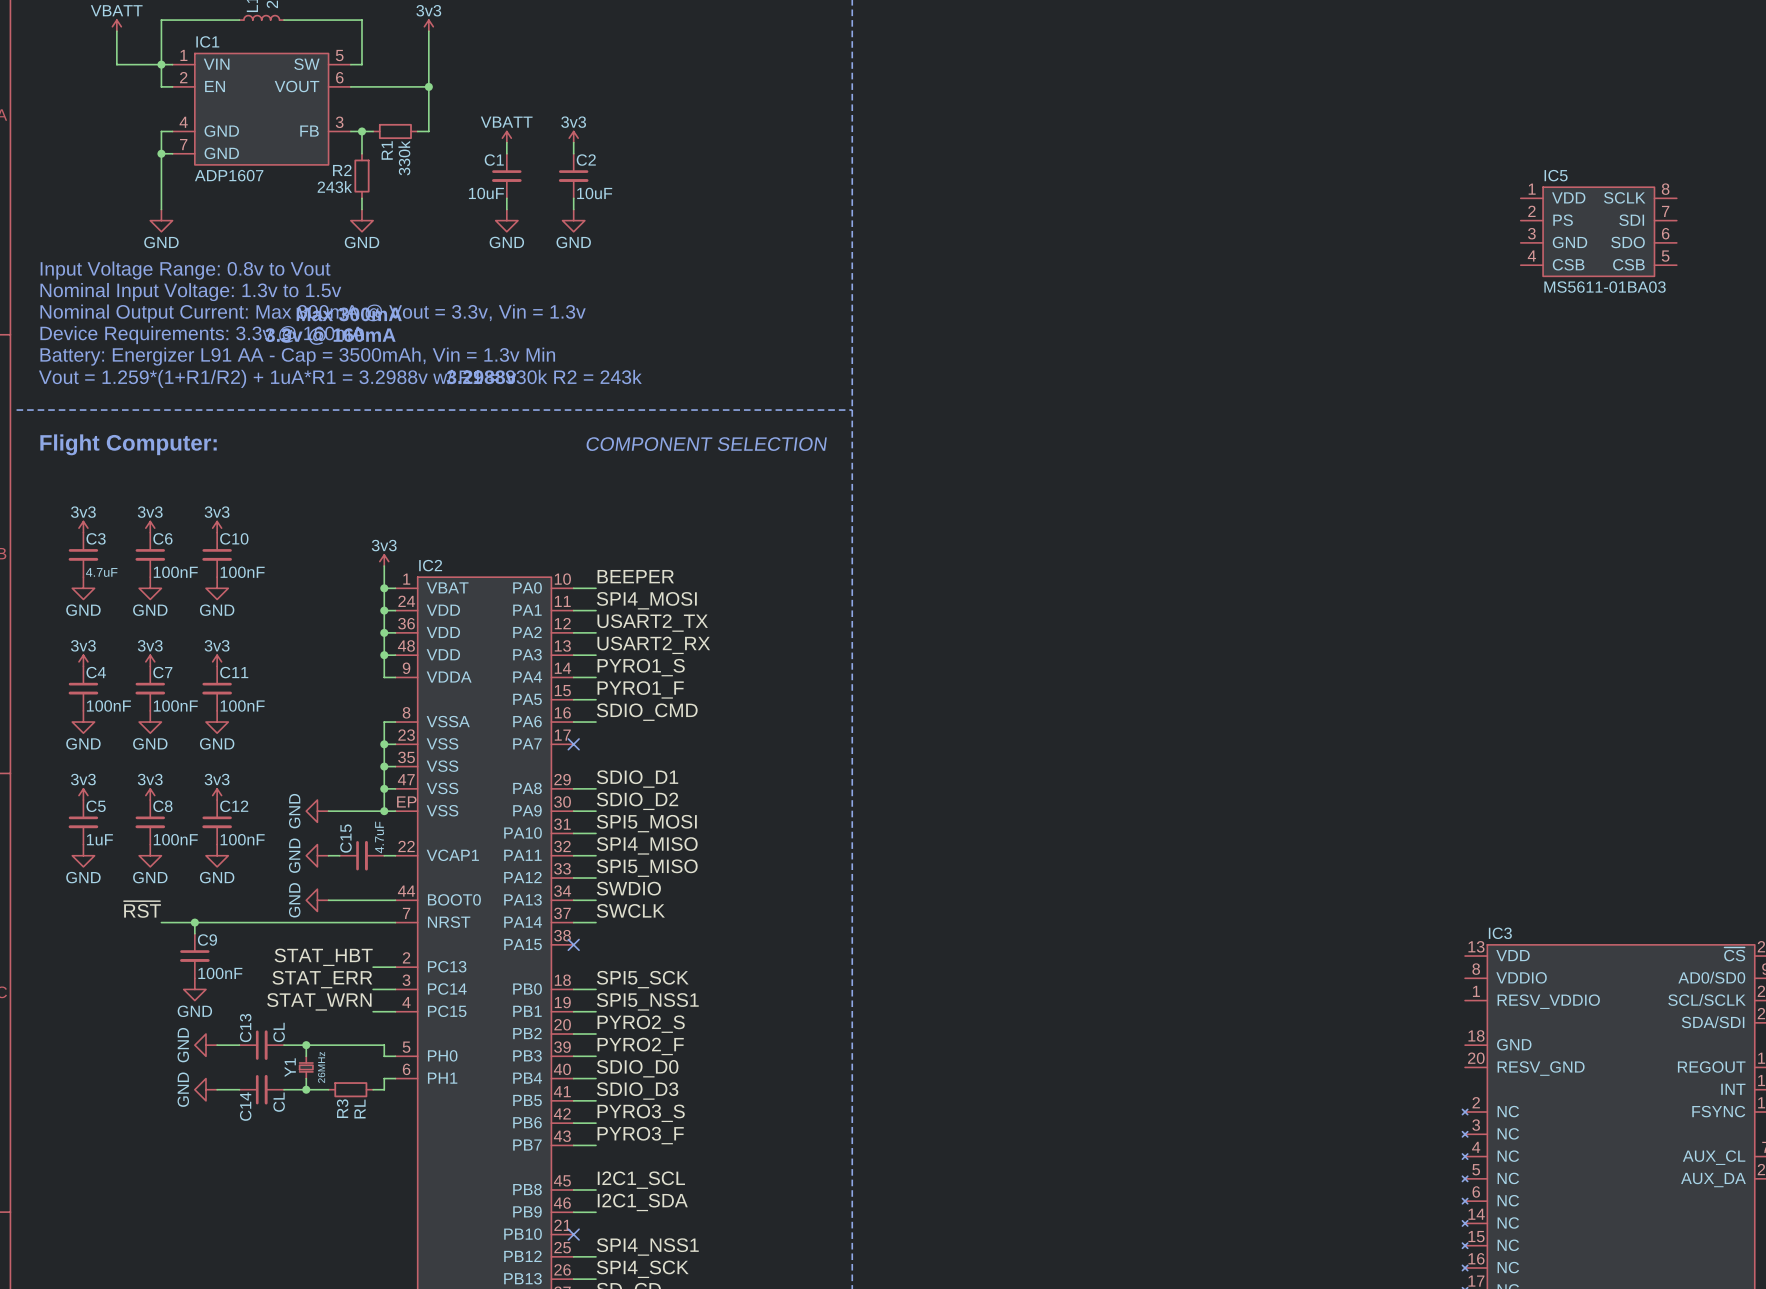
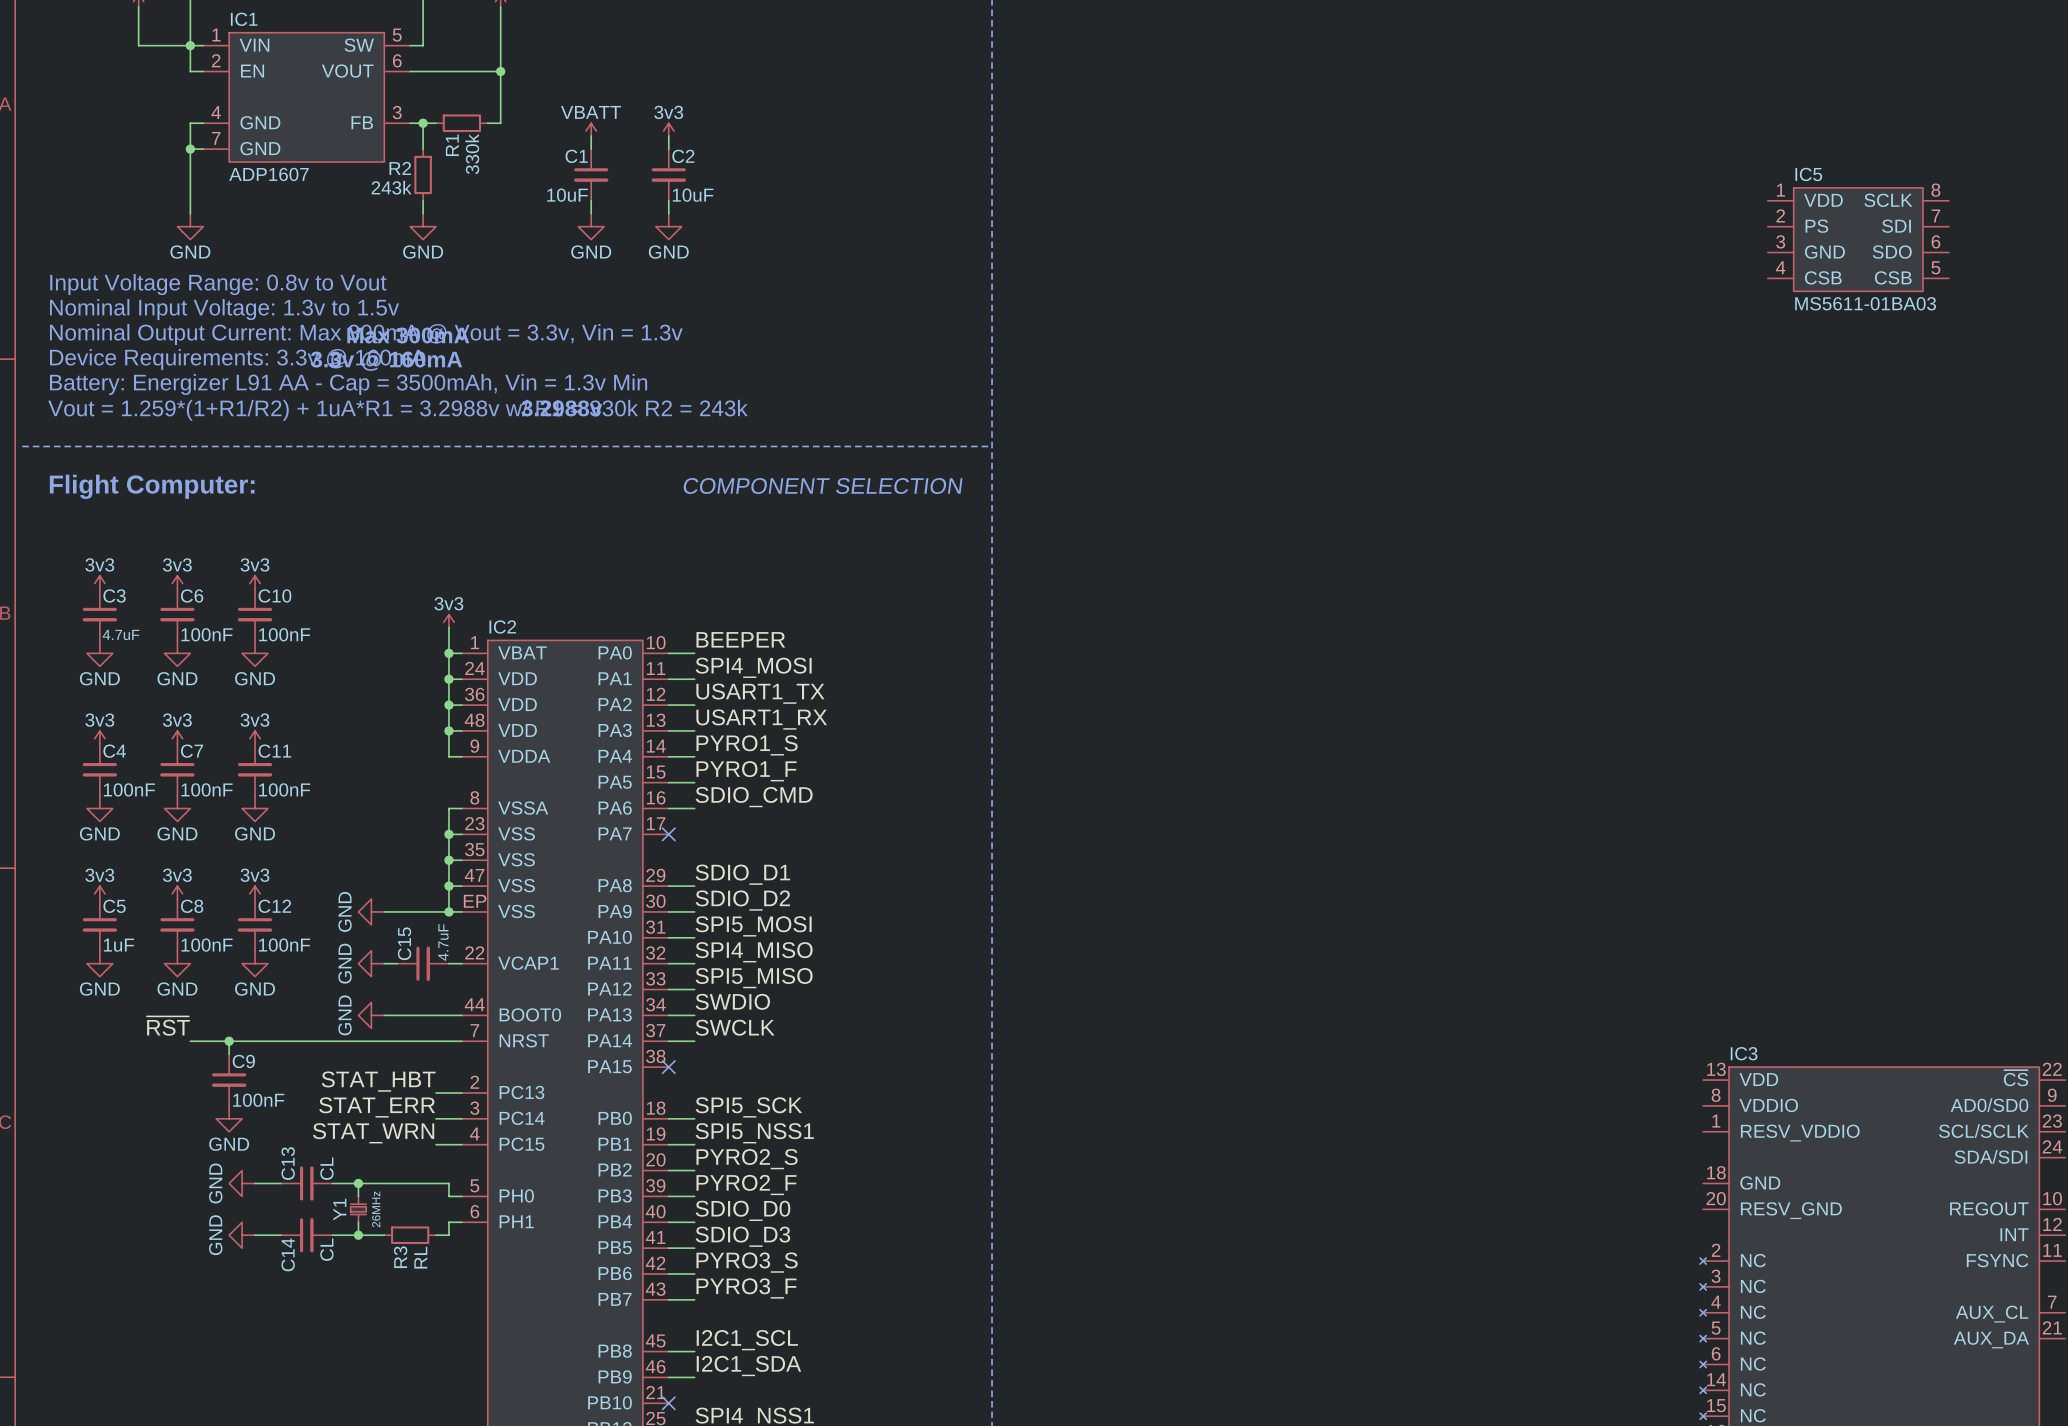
label: USART2_TX (652, 623) -> USART1_TX (760, 693)
label: USART2_RX (653, 645) -> USART1_RX (761, 719)

